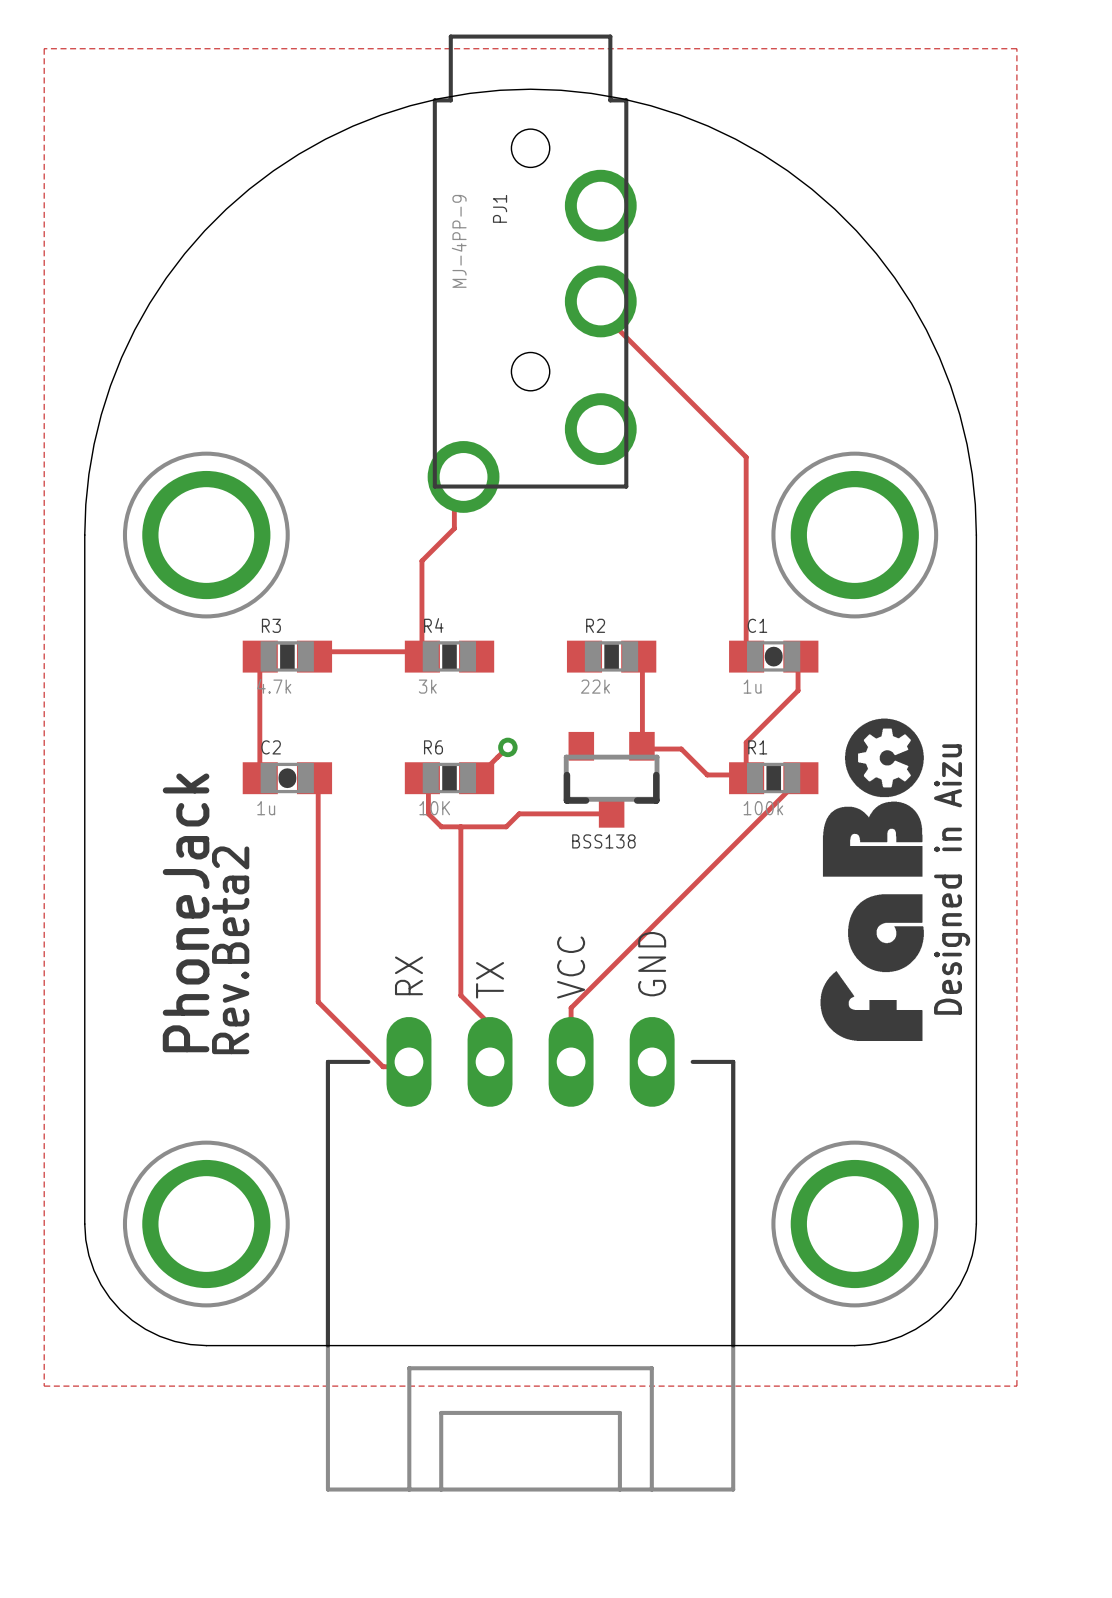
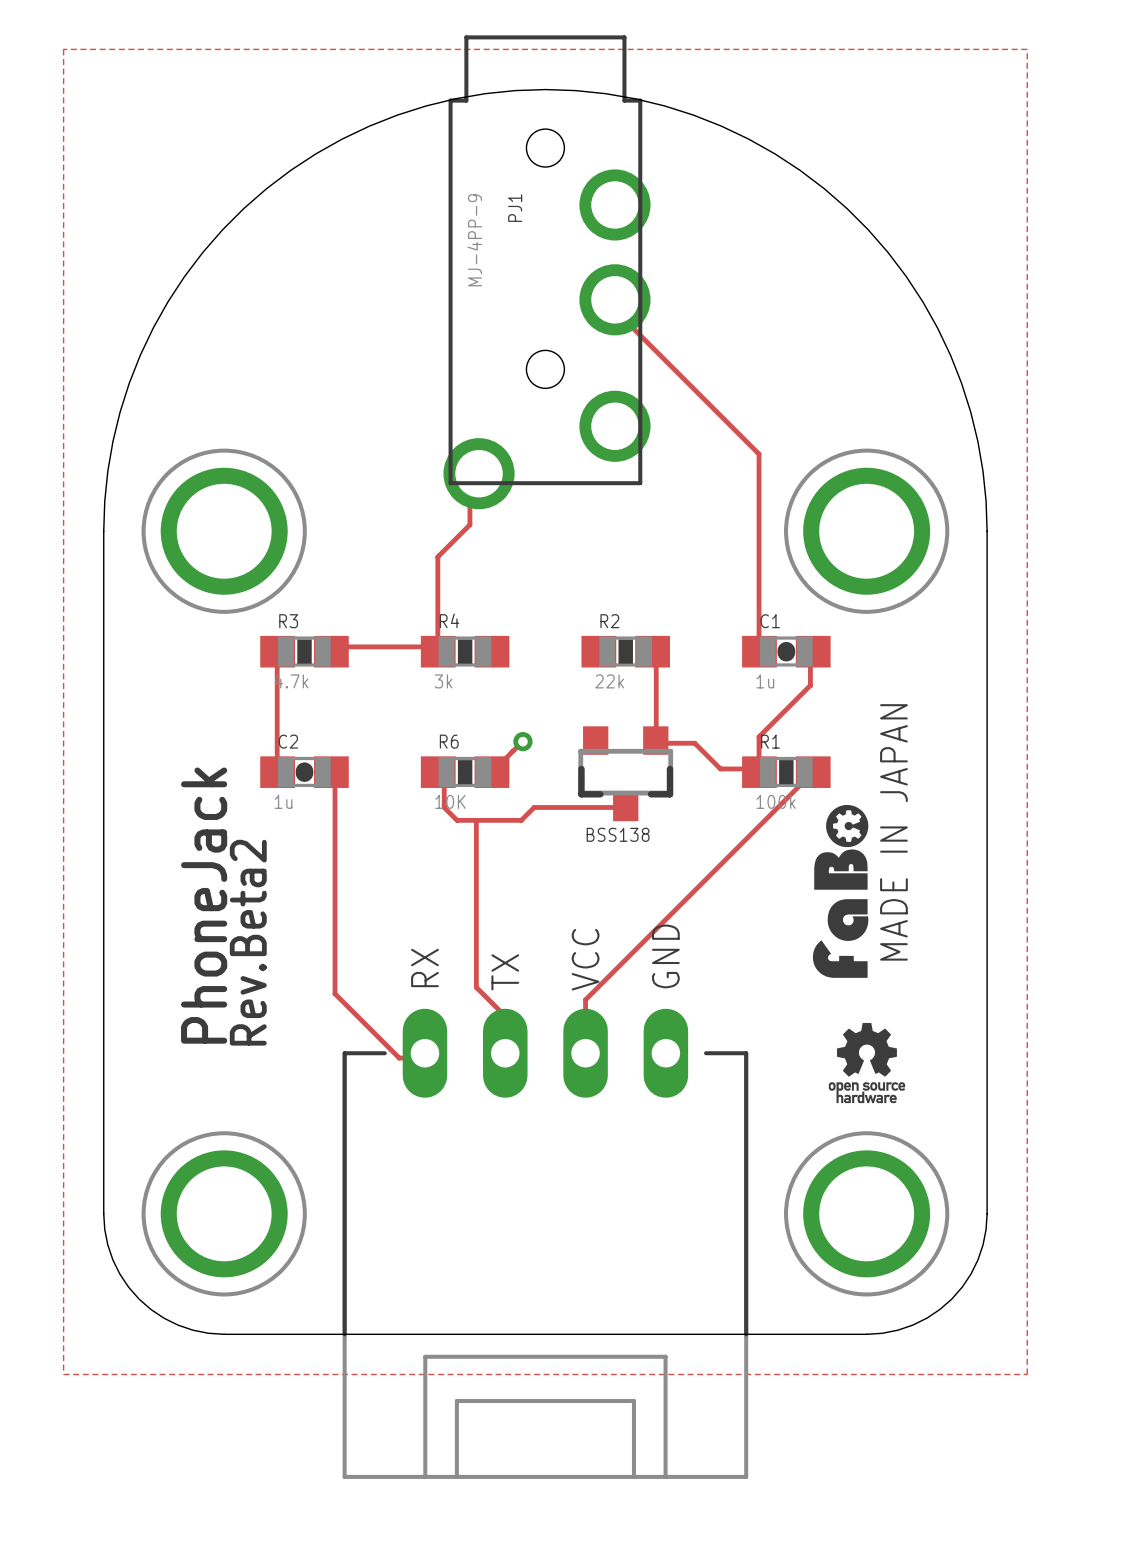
drawing: [820, 718, 924, 1042] -> none
drawing: none -> [812, 804, 869, 978]
text: none -> MADE IN JAPAN (893, 832)
text: Designed in Aizu (952, 879) -> none
drawing: none -> [828, 1022, 906, 1104]

